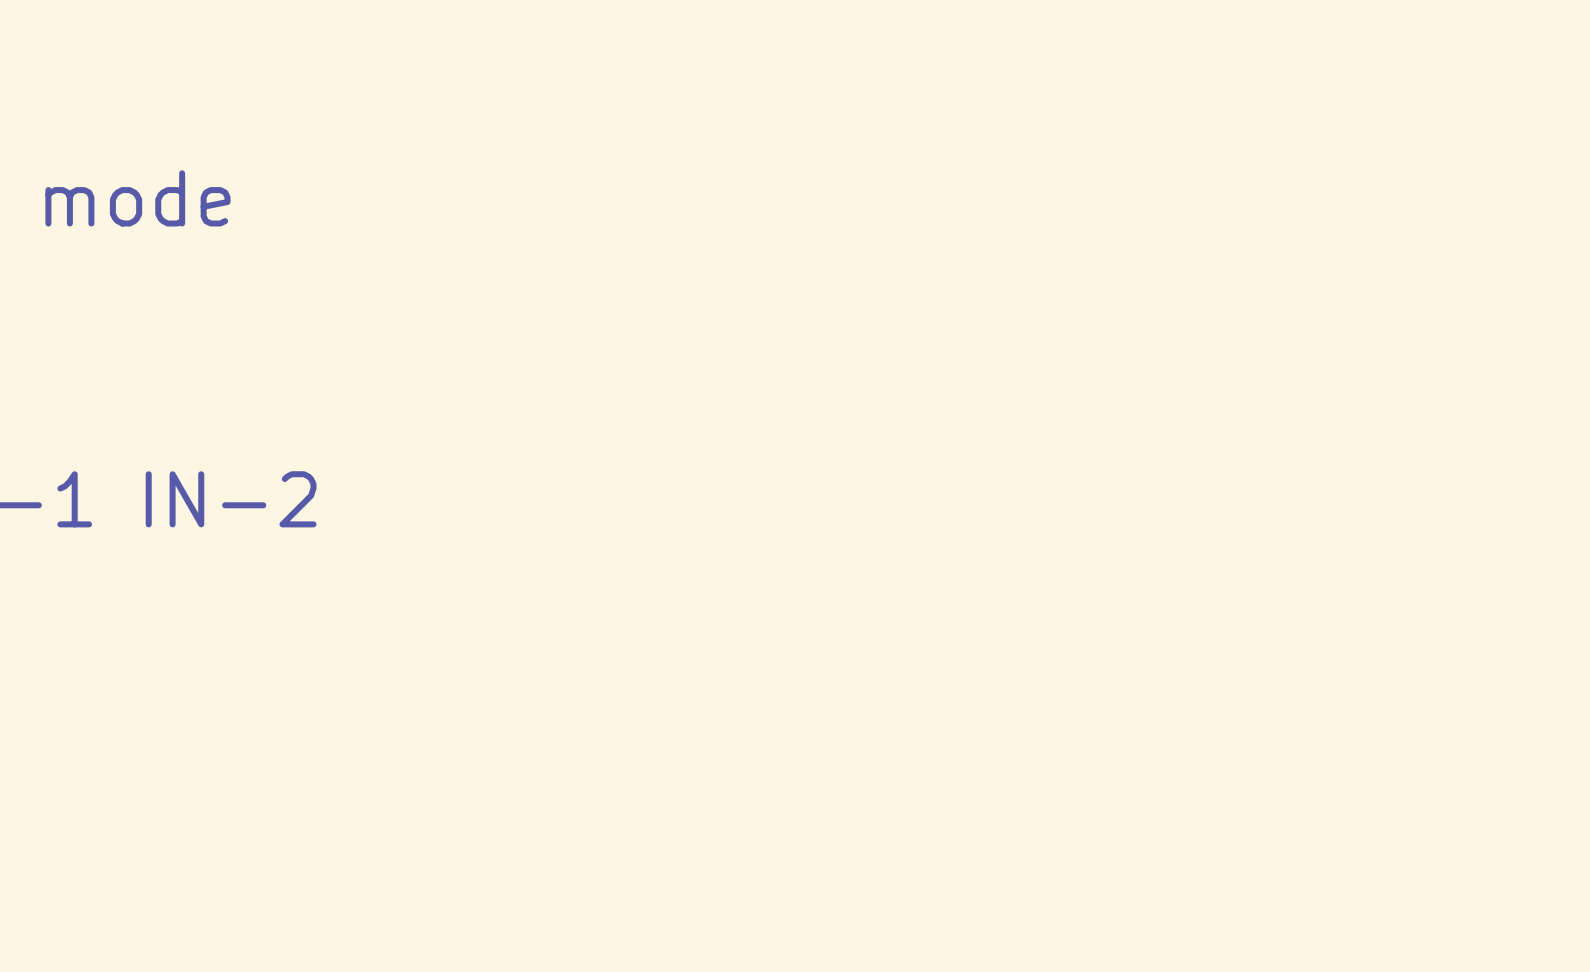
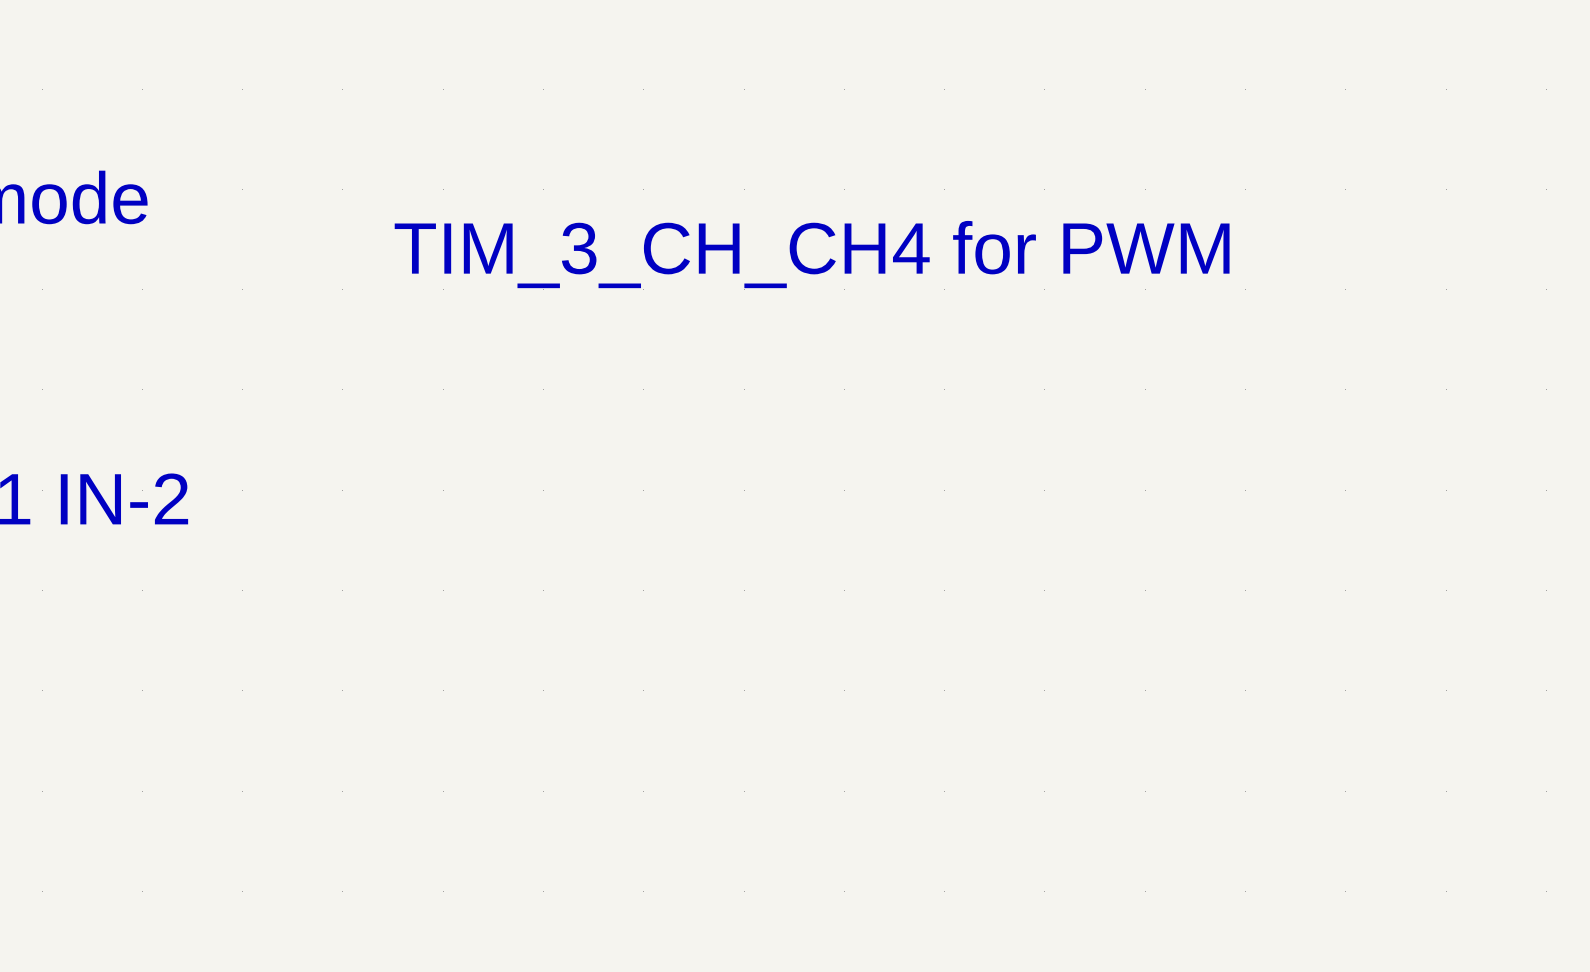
text: none -> TIM_3_CH_CH4 for PWM (812, 254)

